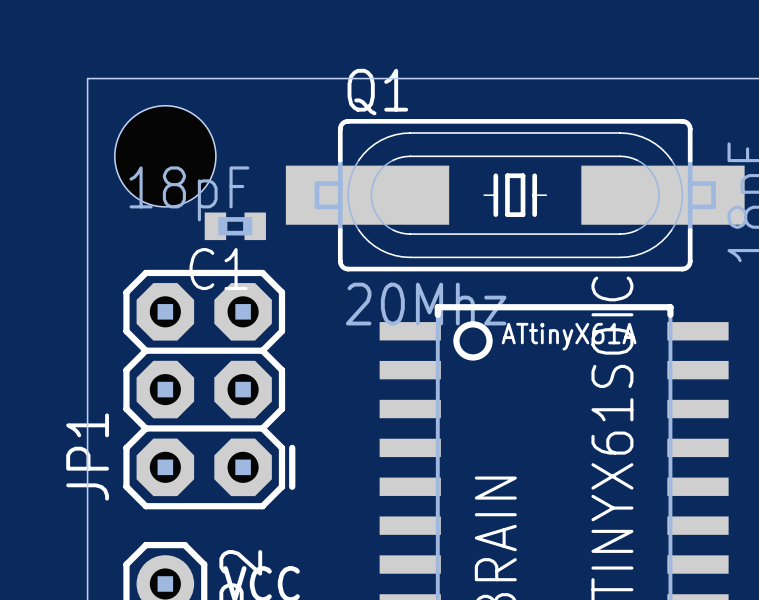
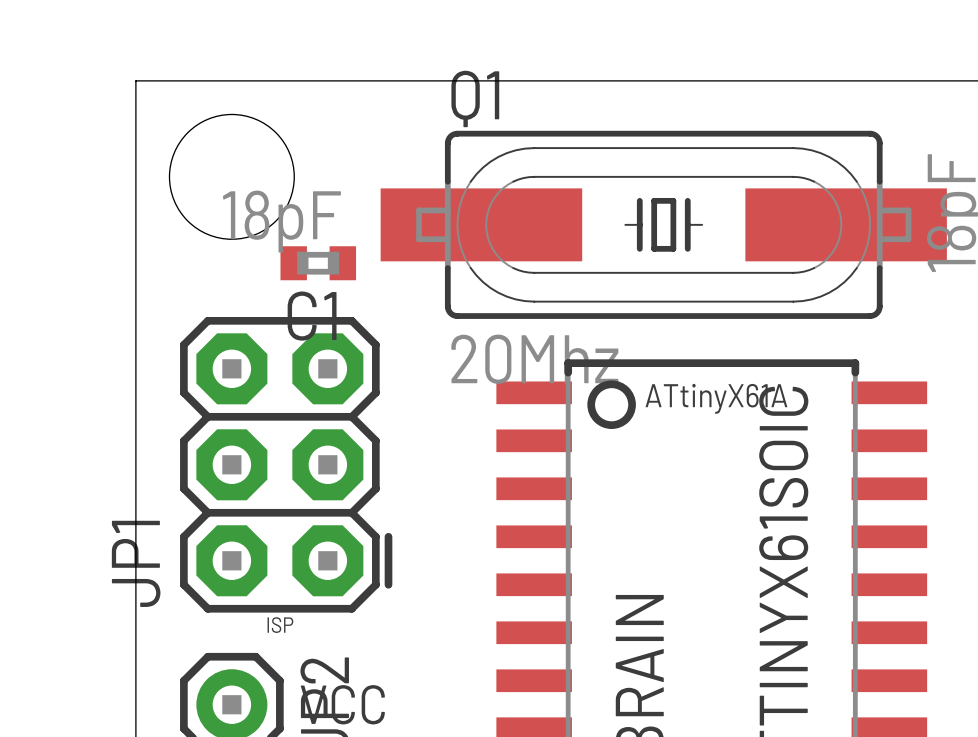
text: none -> ISP (280, 625)

